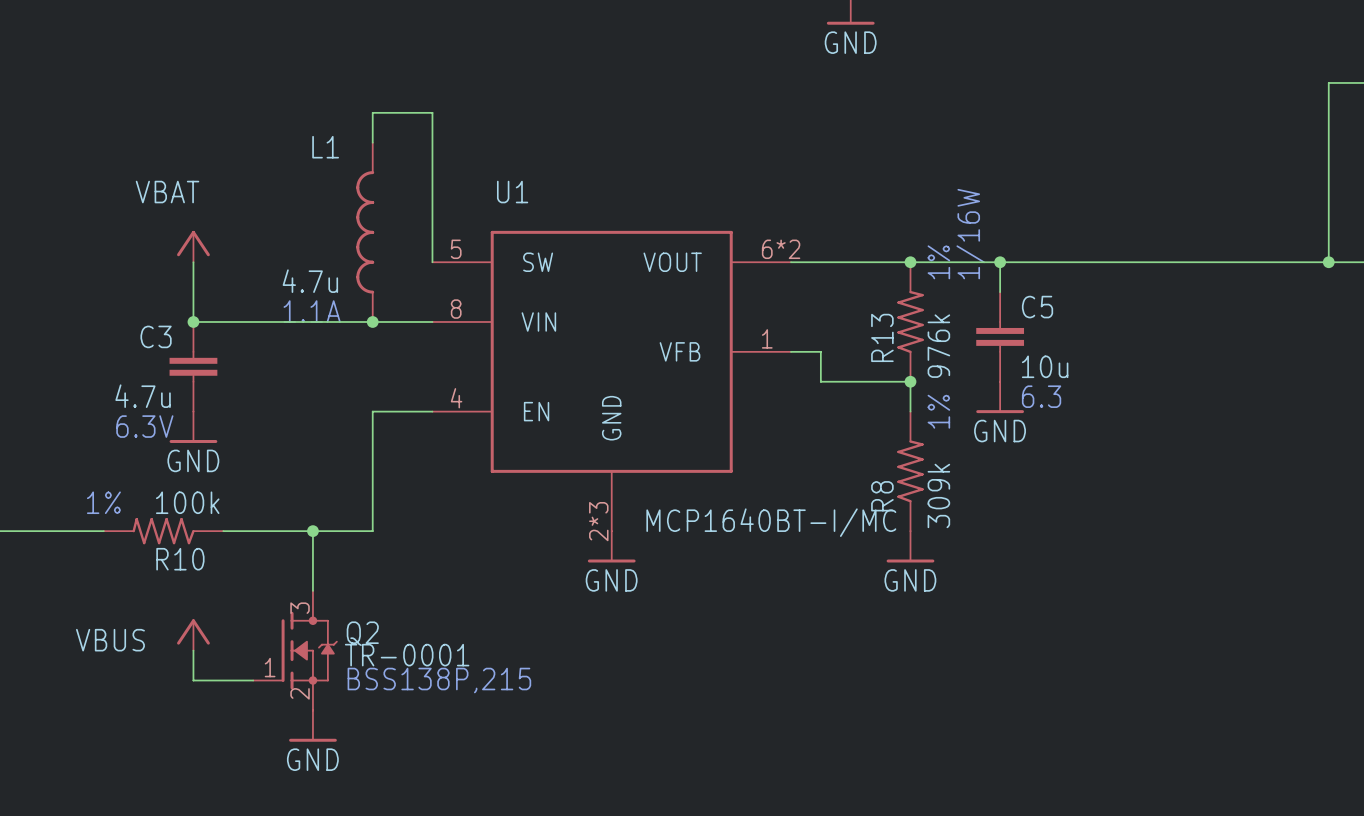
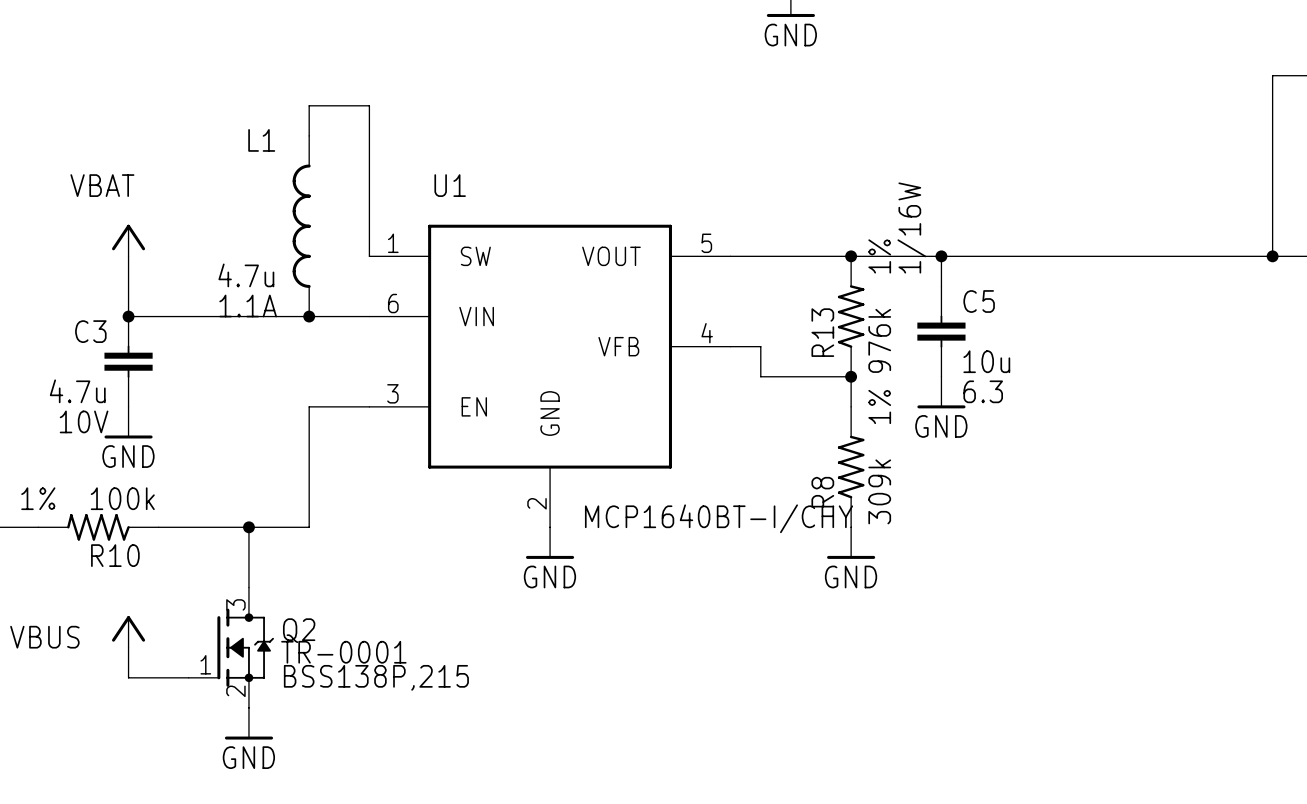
U1 pin number: 5 (456, 249) -> 1 (393, 243)
U1 pin number: 6*2 (781, 249) -> 5 (706, 243)
U1 pin number: 8 (456, 309) -> 6 (393, 303)
U1 pin number: 1 (767, 338) -> 4 (707, 333)
U1 pin number: 4 (456, 398) -> 3 (392, 393)
C3 text: 6.3V (144, 426) -> 10V (84, 421)
U1 pin number: 2*3 (598, 521) -> 2 (537, 503)
U1 text: MCP1640BT-I/MC (771, 522) -> MCP1640BT-I/CHY (719, 518)

